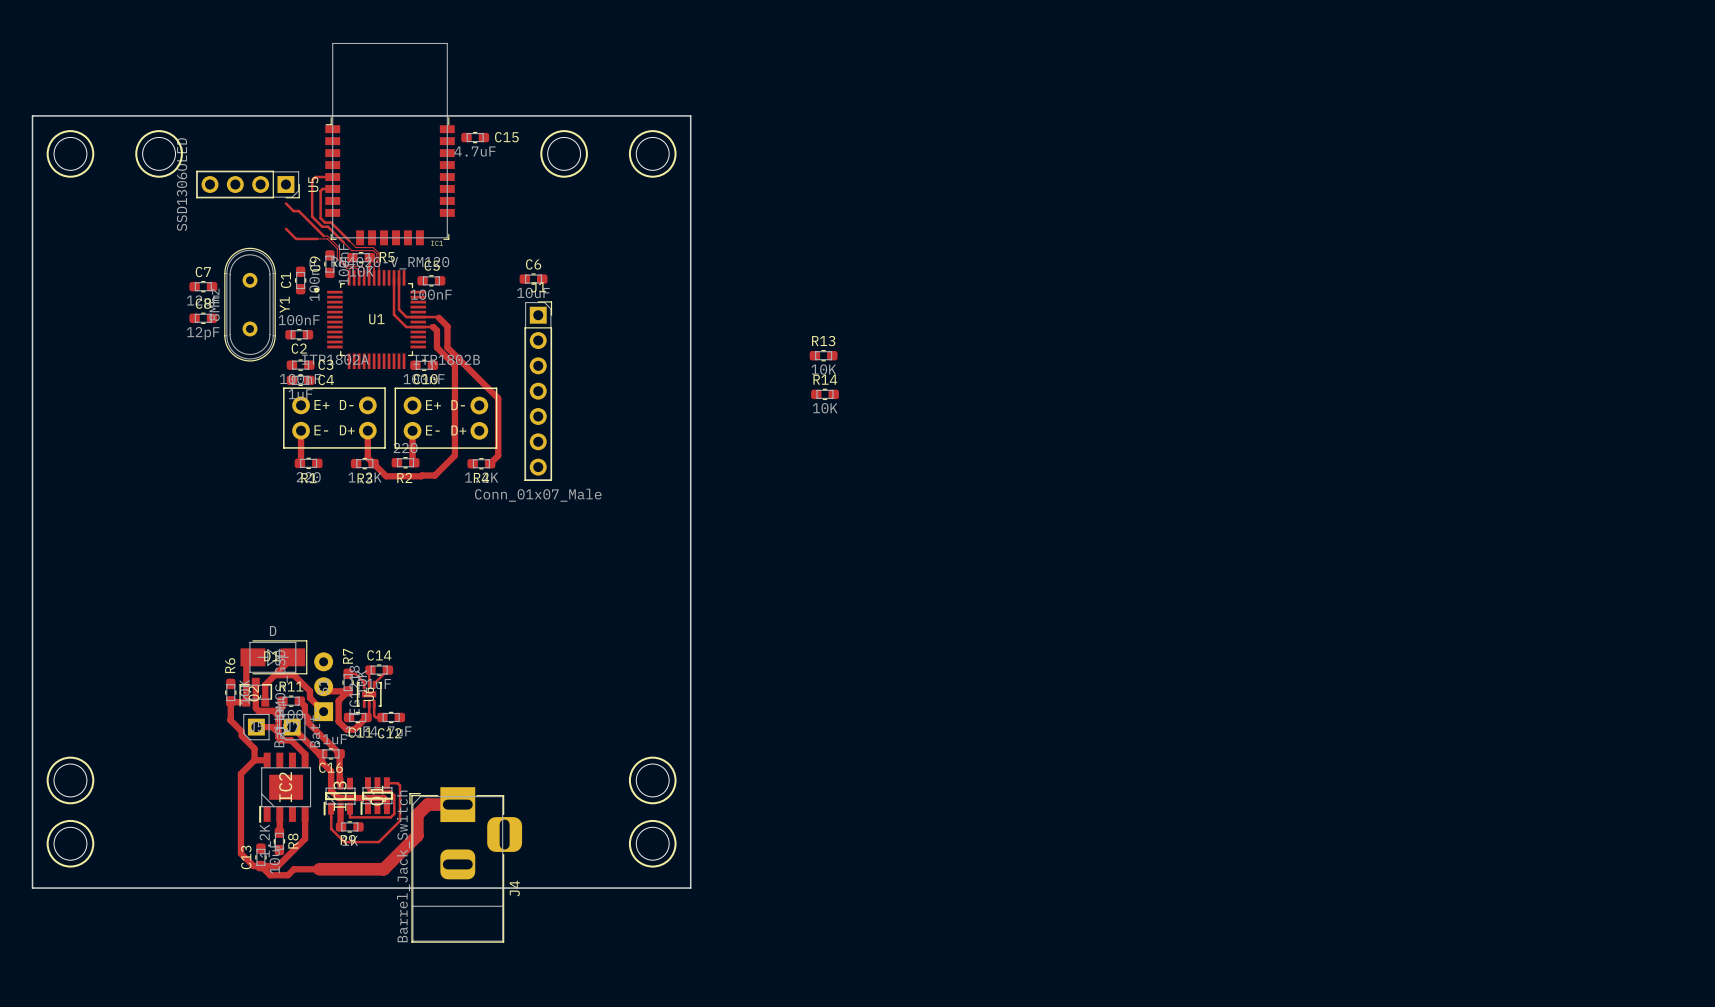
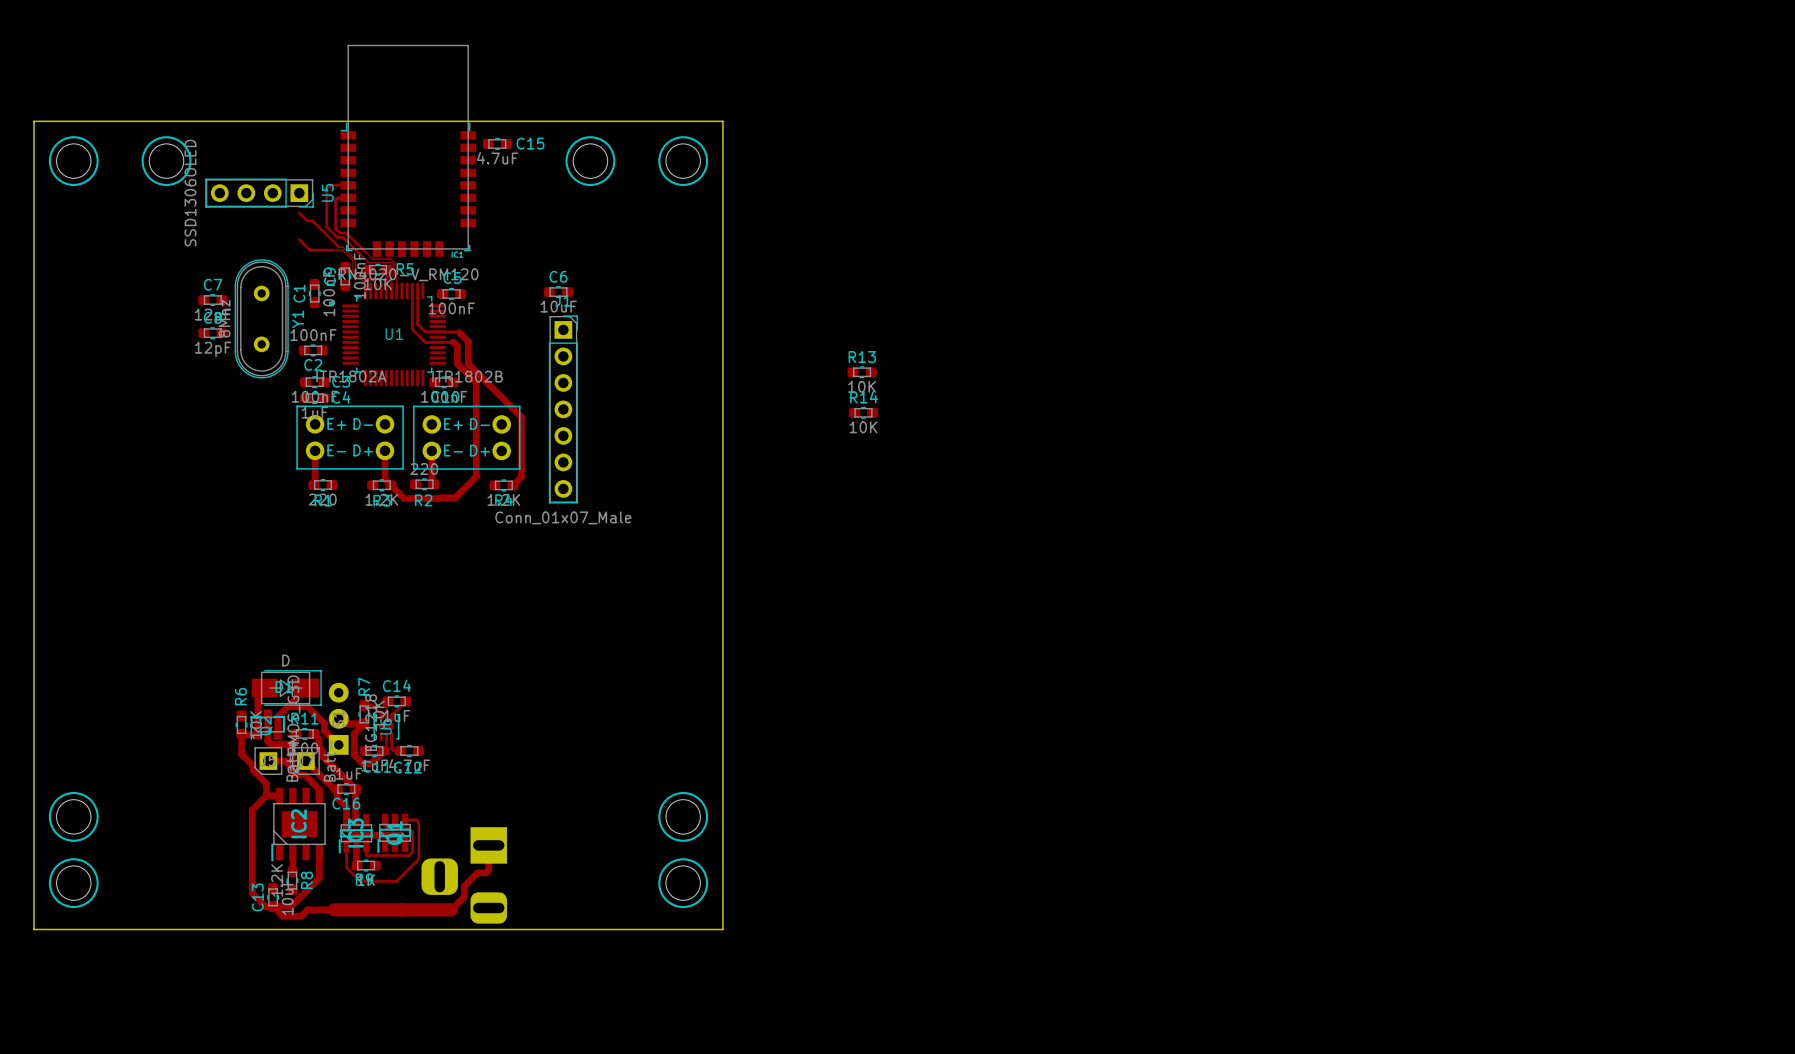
track: (457, 804) (427, 804) (417, 814) (417, 835) (383, 869) -> (451, 909) (401, 909)
track: none -> (488, 845) (488, 870) (486, 872) (477, 872) (464, 886) (464, 896) (451, 909)
J4 side: top (465, 864) -> bottom (464, 875)

